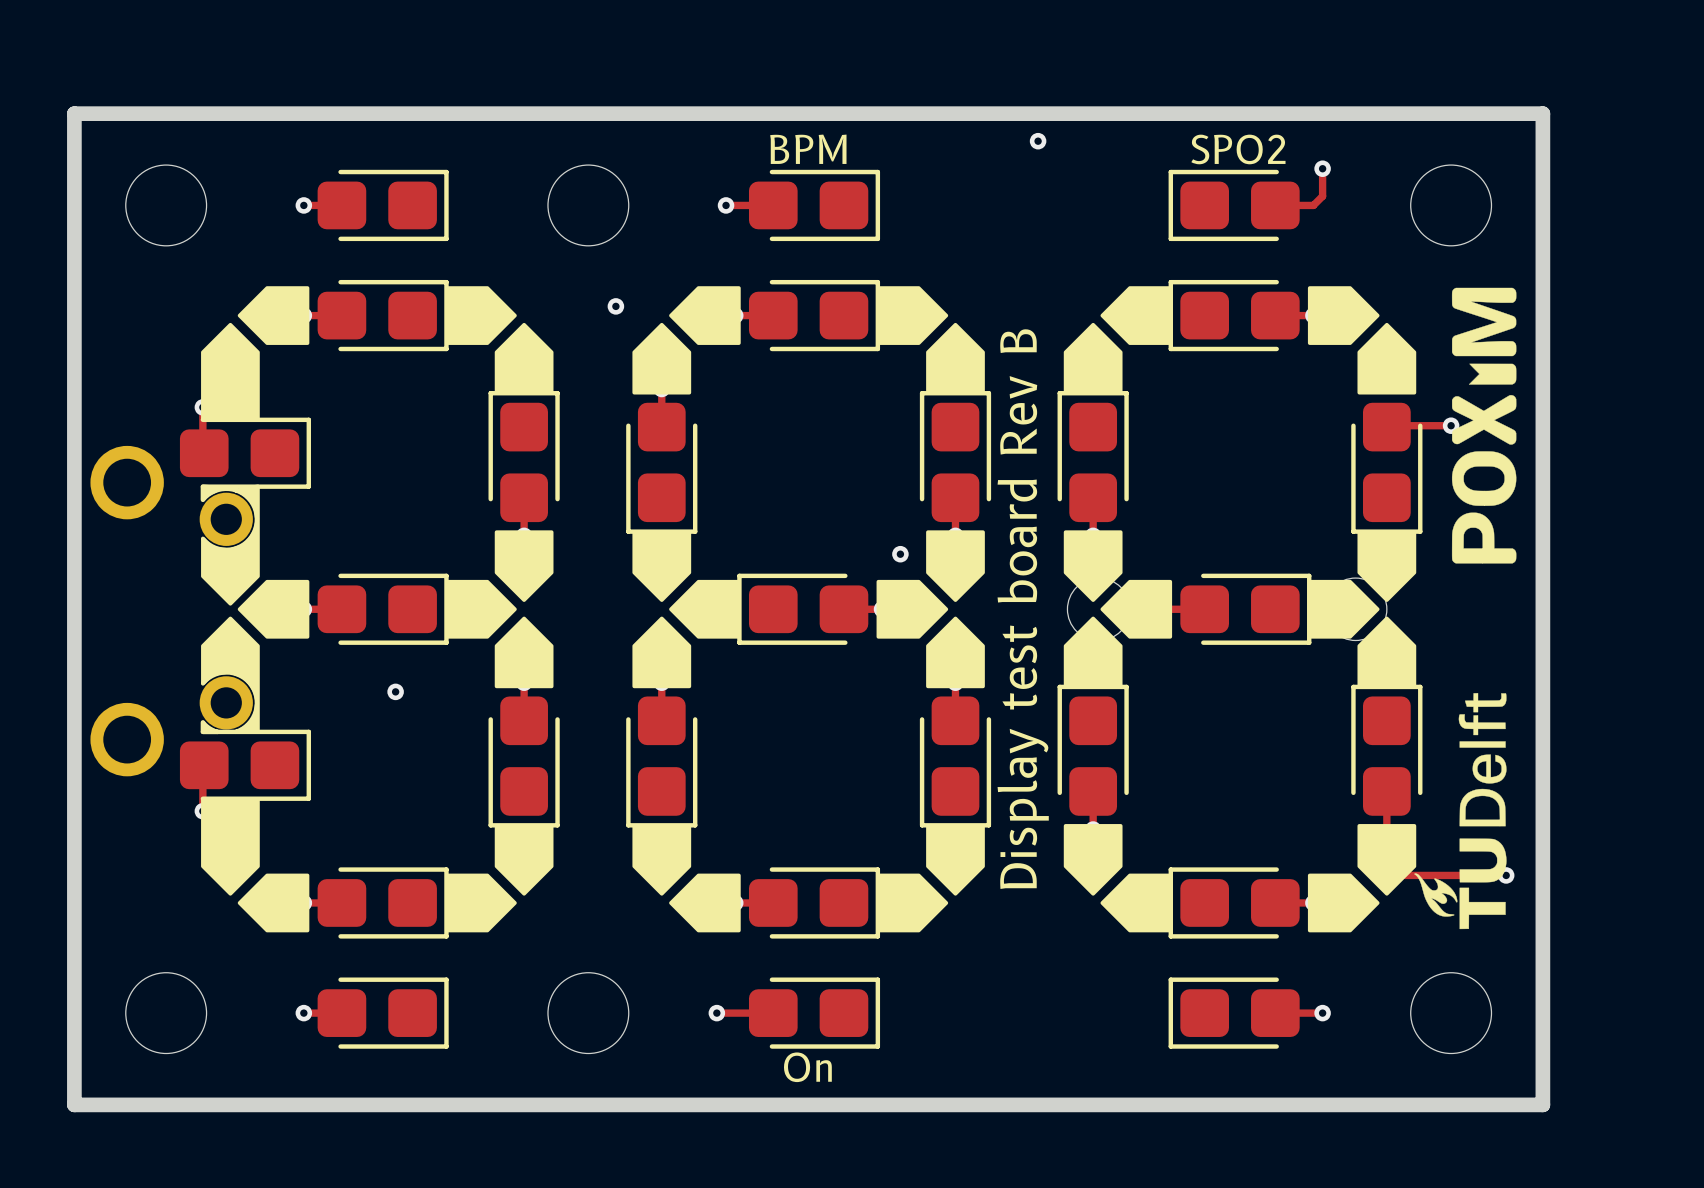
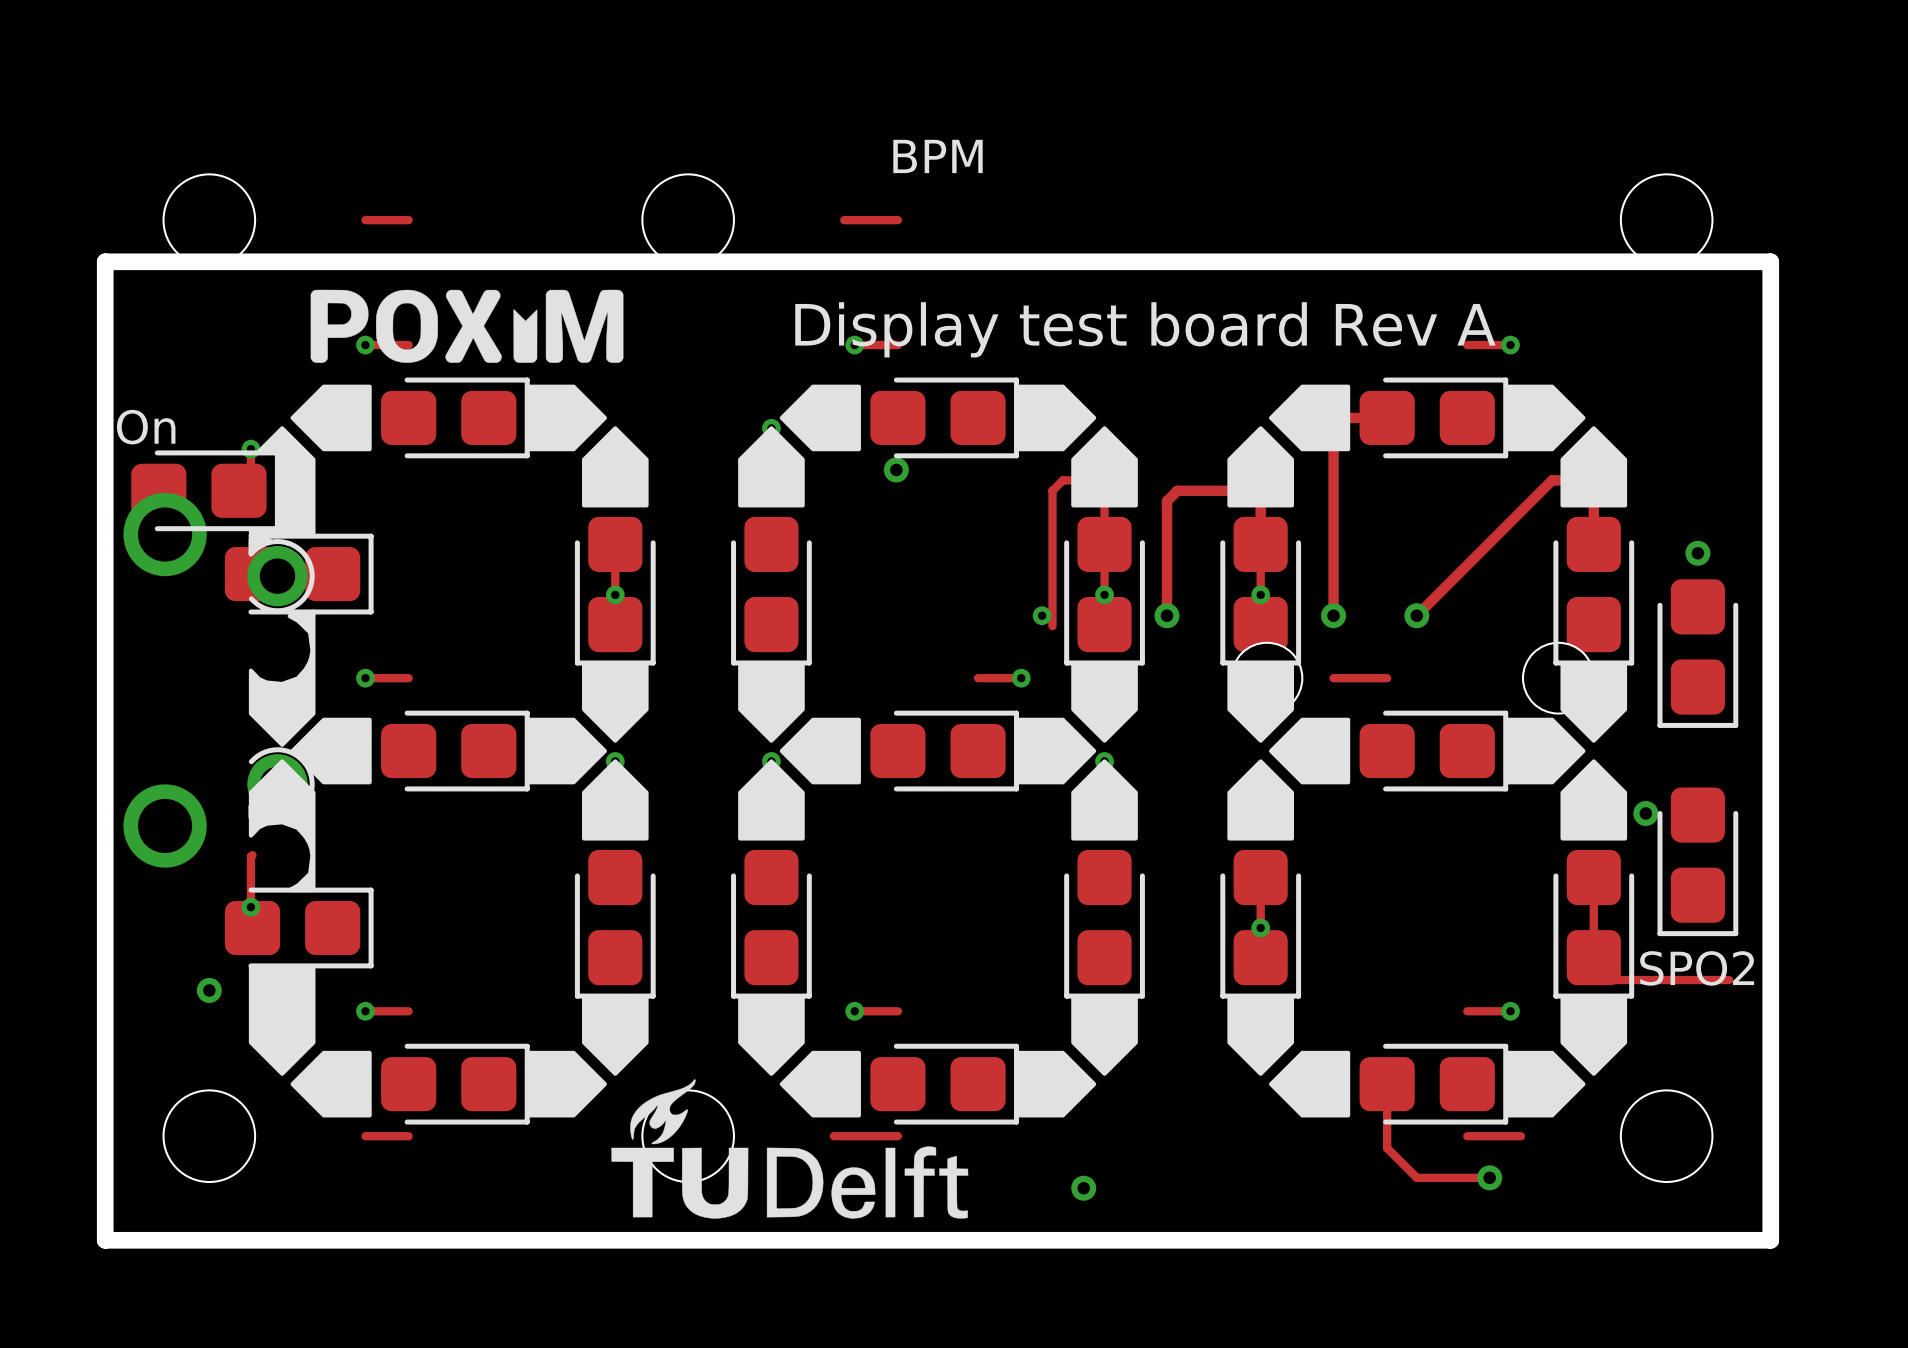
via: (1038, 141) -> none
text position: SPO2 (1238, 149) -> SPO2 (1697, 968)
track: (1322, 168) (1322, 196) (1313, 205) (1275, 205) -> none
via: (1322, 168) -> none
via: (303, 205) -> none
part: (383, 205) -> none
via: (726, 205) -> none
part: (814, 205) -> none
part: (1234, 205) -> none
board edge: (74, 242) (74, 113) (1542, 113) (1542, 242) -> (105, 261) (1770, 261)
drawing: none -> [310, 289, 624, 363]
drawing: [1451, 287, 1517, 564] -> none
via: (615, 306) -> none
drawing position: (273, 315) -> (331, 417)
part position: (383, 315) -> (455, 417)
drawing position: (480, 315) -> (566, 417)
drawing position: (704, 315) -> (820, 417)
part position: (814, 315) -> (944, 417)
drawing position: (912, 315) -> (1055, 417)
drawing position: (1136, 315) -> (1309, 417)
part rotation: 0° (1234, 315) -> 180° (1433, 417)
drawing position: (1343, 315) -> (1544, 417)
drawing: [201, 322, 260, 422] -> none
drawing position: (524, 358) -> (615, 466)
drawing position: (661, 358) -> (771, 466)
drawing position: (955, 358) -> (1104, 466)
drawing position: (1093, 358) -> (1260, 466)
drawing position: (1386, 358) -> (1593, 466)
track: none -> (1387, 417) (1343, 417) (1333, 428) (1333, 615)
drawing: none -> [248, 426, 316, 538]
text: none -> On (146, 427)
via: none -> (896, 469)
track: (1451, 425) (1386, 427) -> none
via: (1451, 425) -> none
part: none -> (205, 490)
part: (245, 453) -> none
part: (524, 456) -> none
part rotation: 0° (955, 456) -> 180° (1104, 591)
part rotation: 0° (1093, 456) -> 180° (1260, 591)
part position: (661, 468) -> (771, 591)
part position: (1386, 468) -> (1593, 591)
track: none -> (1104, 544) (1104, 490) (1094, 480) (1062, 480) (1052, 490) (1052, 626)
track: none -> (1260, 544) (1260, 501) (1250, 490) (1177, 490) (1167, 501) (1167, 615)
track: none -> (1593, 544) (1593, 490) (1583, 480) (1552, 480) (1416, 615)
via: none -> (1697, 553)
part: none -> (299, 574)
part: none -> (615, 591)
drawing position: (230, 545) -> (282, 678)
via: none -> (1167, 615)
via: none -> (1333, 615)
via: none -> (1416, 615)
drawing position: (524, 566) -> (615, 702)
drawing position: (661, 566) -> (771, 702)
drawing position: (955, 566) -> (1104, 702)
drawing position: (1093, 566) -> (1260, 702)
drawing position: (1386, 566) -> (1593, 702)
part: none -> (1697, 653)
drawing position: (273, 609) -> (331, 751)
part position: (383, 609) -> (455, 751)
drawing position: (480, 609) -> (566, 751)
drawing position: (704, 609) -> (820, 751)
part rotation: 0° (802, 609) -> 180° (944, 751)
drawing position: (912, 609) -> (1055, 751)
text: Display test board Rev B (1023, 609) -> Display test board Rev A (1145, 329)
drawing position: (1136, 609) -> (1309, 751)
part position: (1245, 609) -> (1433, 751)
drawing position: (1343, 609) -> (1544, 751)
drawing position: (524, 652) -> (615, 799)
drawing position: (661, 652) -> (771, 799)
drawing position: (955, 652) -> (1104, 799)
drawing position: (1093, 652) -> (1260, 799)
drawing position: (1386, 652) -> (1593, 799)
drawing position: (230, 675) -> (282, 825)
via: (395, 691) -> none
drawing: [1414, 693, 1507, 930] -> none
via: none -> (1645, 813)
part: (1093, 750) -> none
part: (1386, 750) -> none
part position: (524, 762) -> (615, 924)
part position: (661, 762) -> (771, 924)
part position: (955, 762) -> (1104, 924)
part position: (245, 765) -> (299, 928)
part: none -> (1697, 861)
part: none -> (1260, 924)
part: none -> (1593, 924)
drawing position: (230, 846) -> (282, 1020)
drawing position: (524, 859) -> (615, 1035)
drawing position: (661, 859) -> (771, 1035)
drawing position: (955, 859) -> (1104, 1035)
drawing position: (1093, 859) -> (1260, 1035)
drawing position: (1386, 859) -> (1593, 1035)
via: (1506, 875) -> none
via: none -> (209, 990)
drawing position: (273, 902) -> (331, 1084)
part: (383, 902) -> none
drawing position: (480, 902) -> (566, 1084)
drawing position: (704, 902) -> (820, 1084)
part: (814, 902) -> none
drawing position: (912, 902) -> (1055, 1084)
drawing position: (1136, 902) -> (1309, 1084)
part: (1234, 902) -> none
drawing position: (1343, 902) -> (1544, 1084)
drawing: none -> [611, 1079, 969, 1219]
part: none -> (455, 1084)
part: none -> (944, 1084)
track: none -> (1387, 1084) (1387, 1148) (1416, 1177) (1489, 1177)
part: none -> (1433, 1084)
via: (303, 1013) -> none
part: (383, 1013) -> none
via: (716, 1013) -> none
part: (814, 1013) -> none
part: (1234, 1013) -> none
via: (1322, 1013) -> none
via: none -> (1489, 1177)
via: none -> (1083, 1188)
text: On (807, 1067) -> none

